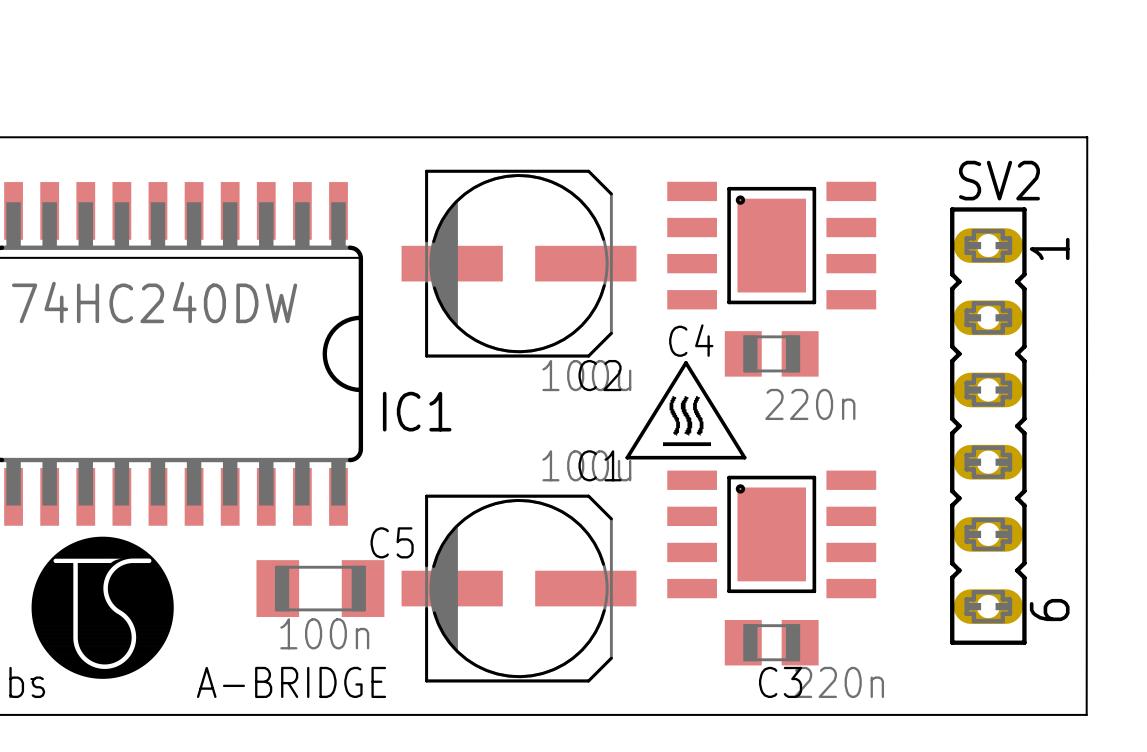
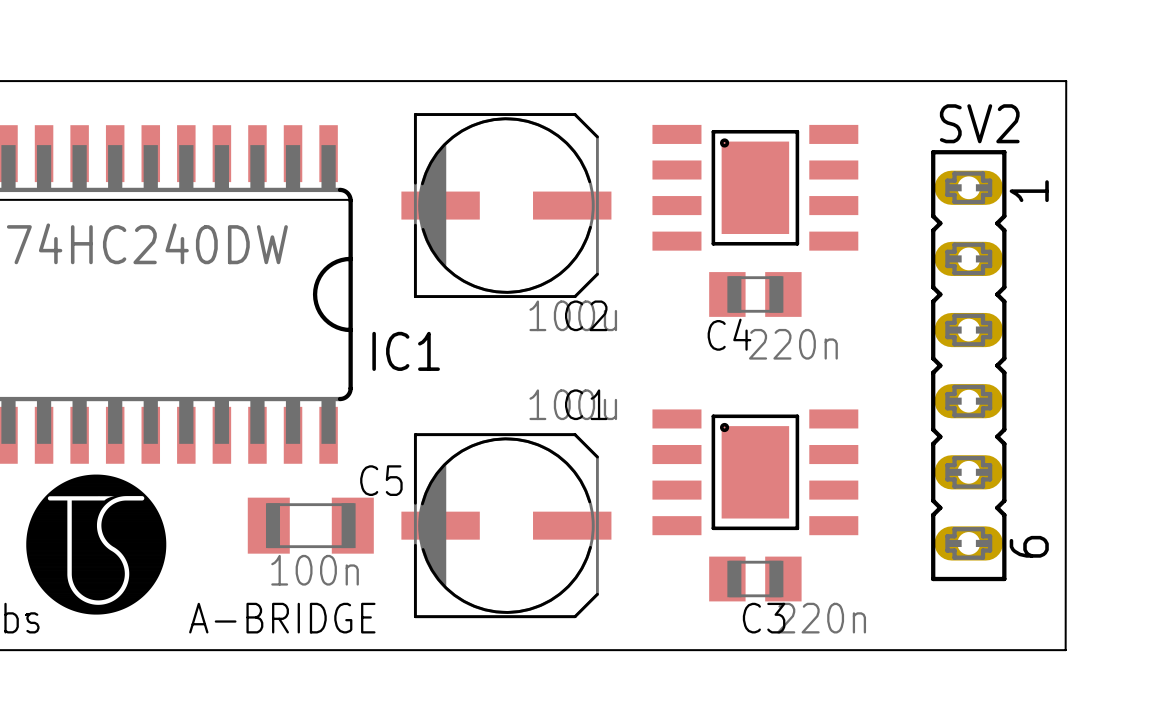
C2 footprint: [401, 169, 637, 358] -> [401, 113, 612, 299]
C4 name position: C4 (691, 340) -> C4 (729, 334)
line: (685, 362) (744, 457) (627, 457) (685, 362) -> none
drawing: [662, 396, 712, 447] -> none
C1 footprint: [401, 494, 637, 683] -> [401, 433, 612, 619]

